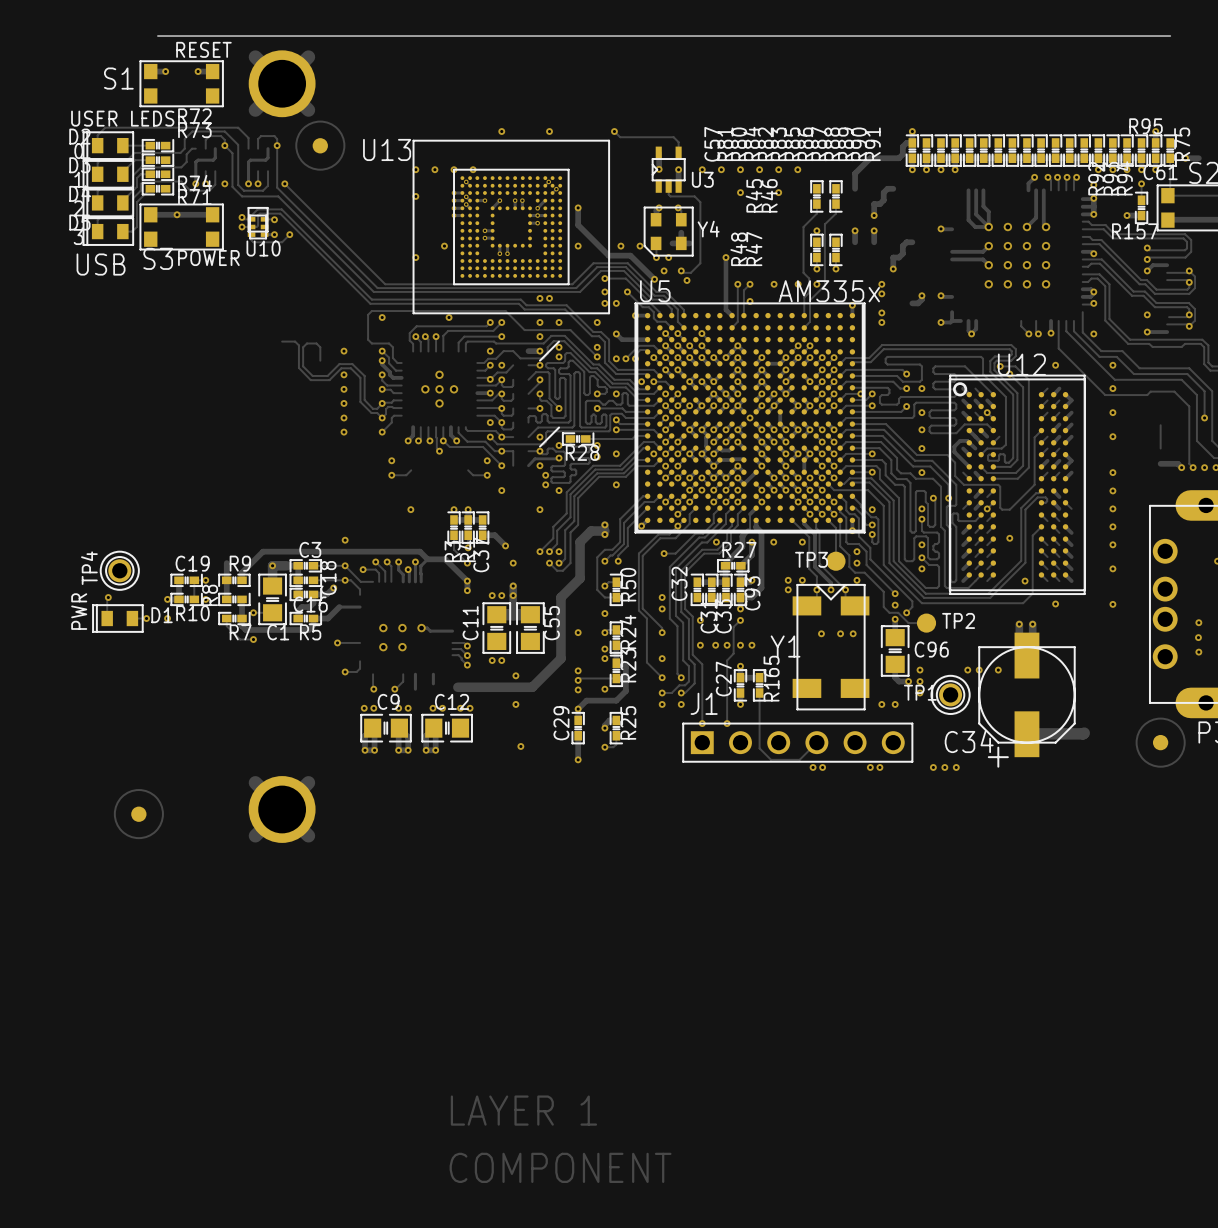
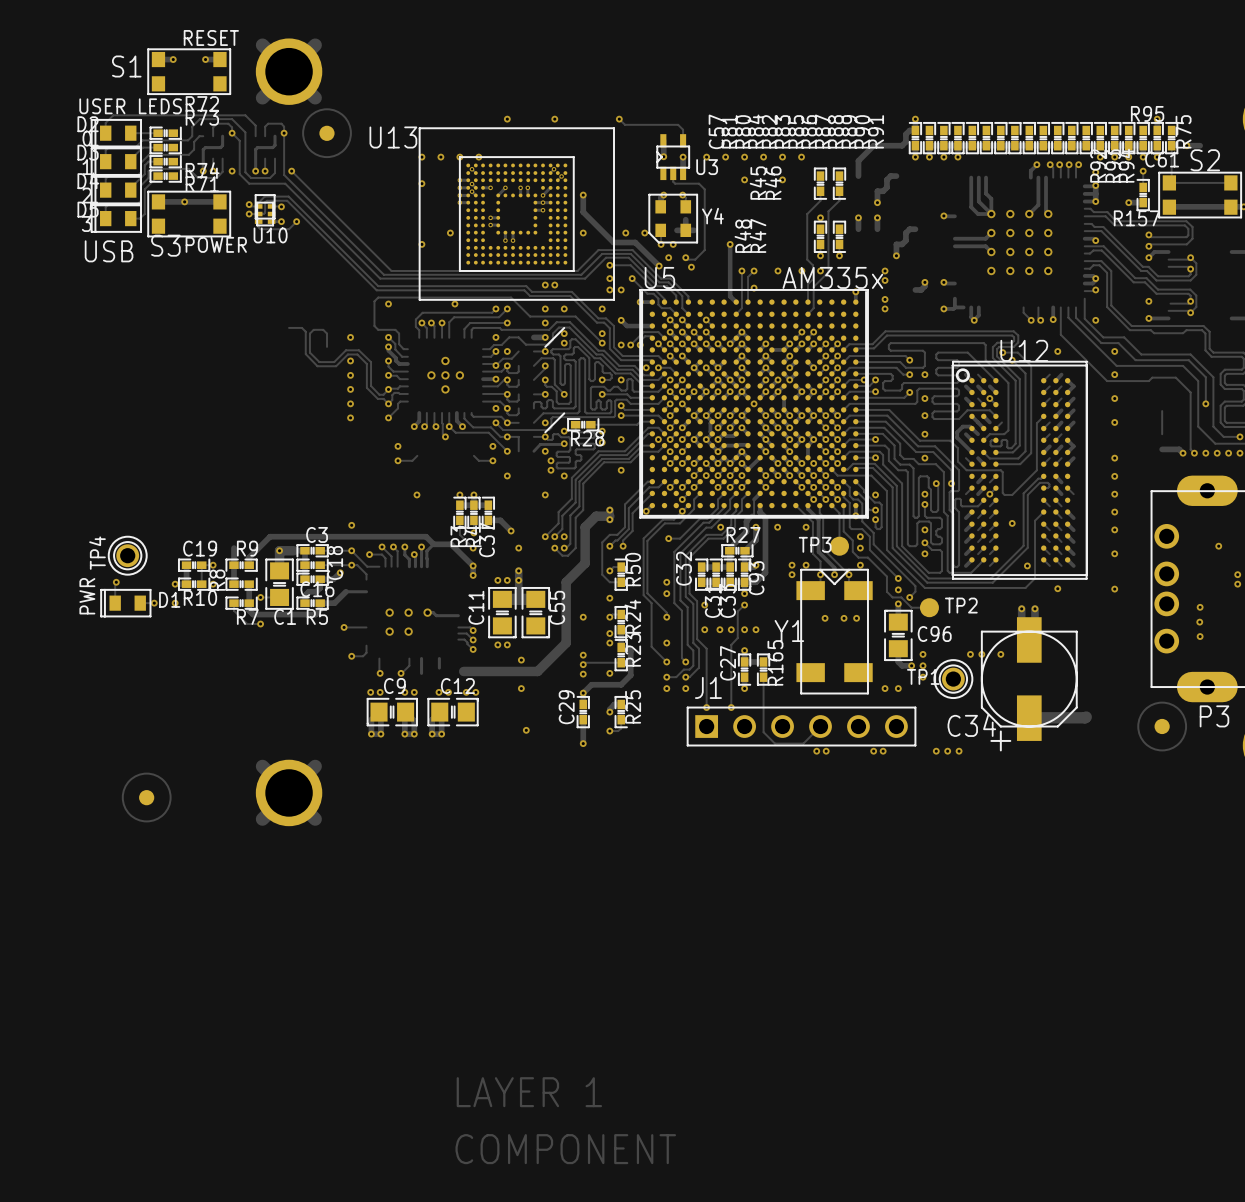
board edge: (157, 36) (1170, 36) -> none

